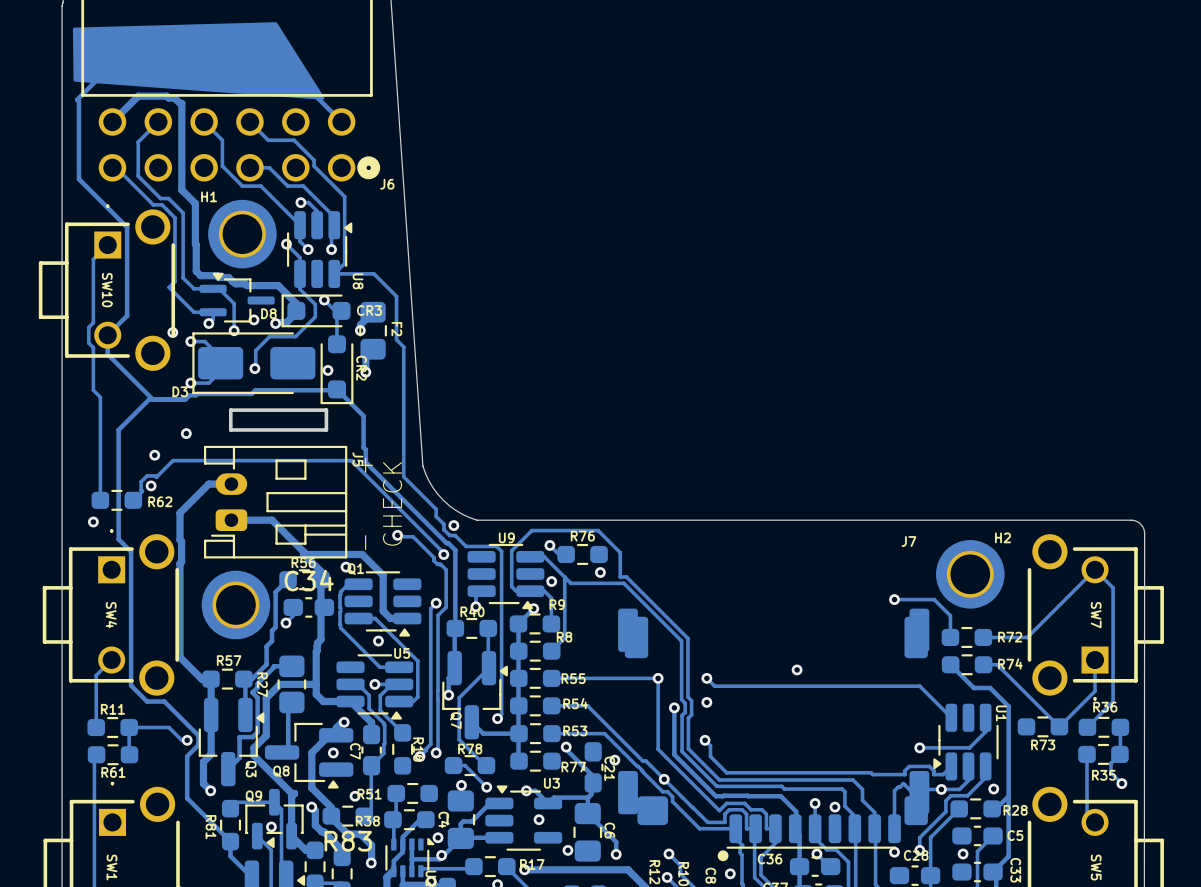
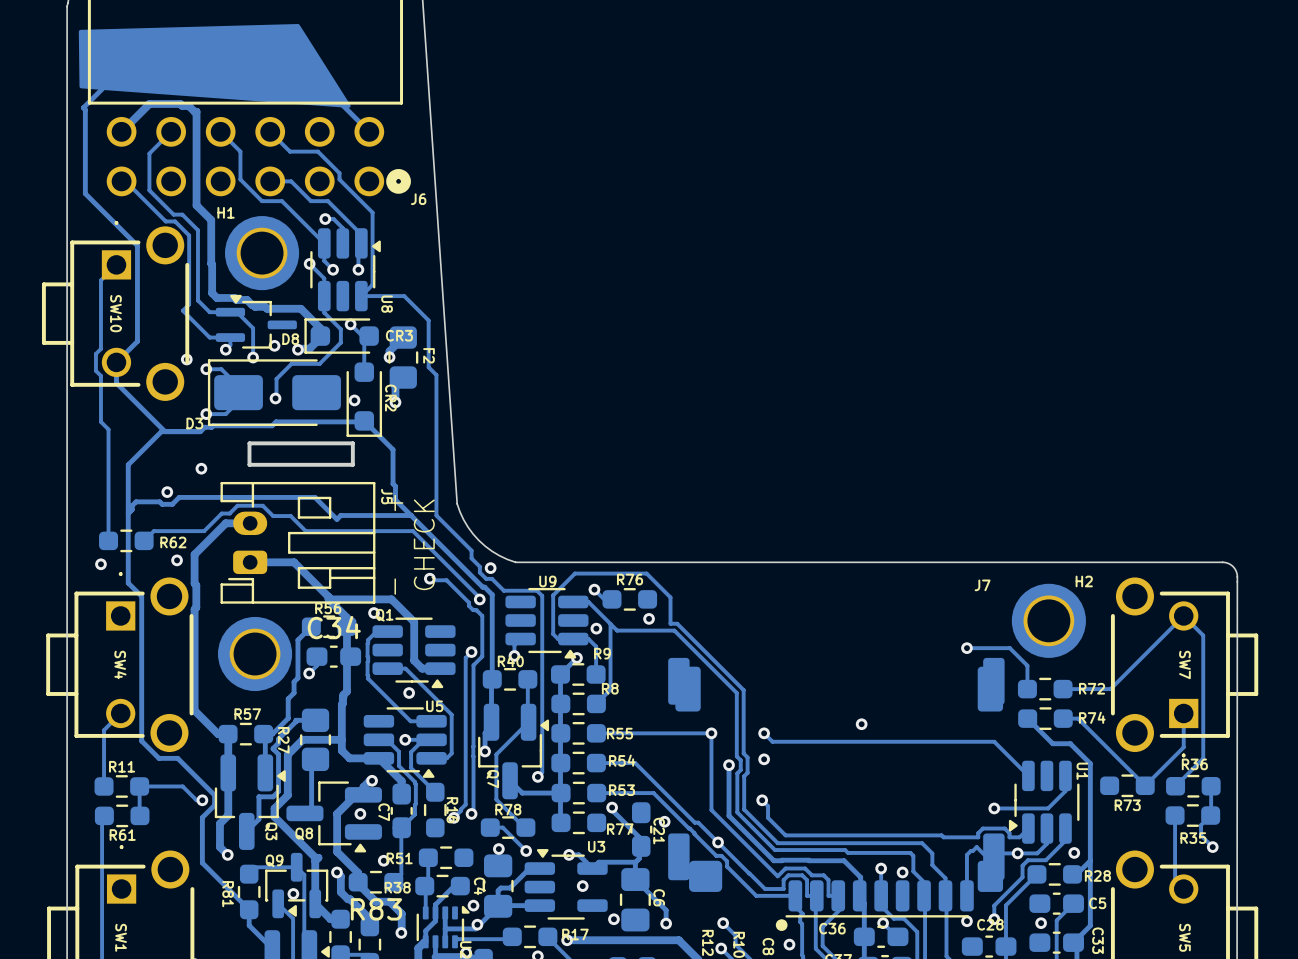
track: none -> (128, 513) (136, 501) (159, 501) (162, 504) (172, 504) (179, 497) (314, 497) (336, 519) (340, 515) (411, 515)
via position: (151, 485) -> (177, 560)
track: (382, 491) (351, 460) (173, 460) (156, 477) (147, 475) (141, 481) (142, 491) -> (413, 531) (305, 531) (290, 516) (273, 516) (262, 505) (237, 505) (229, 513) (221, 513) (204, 531) (153, 531)

